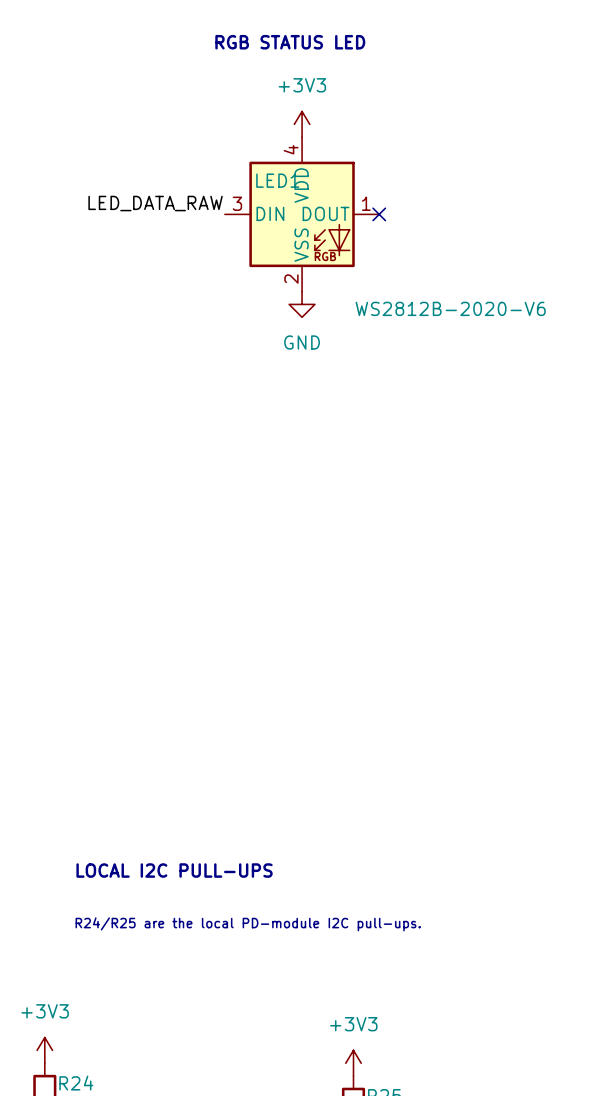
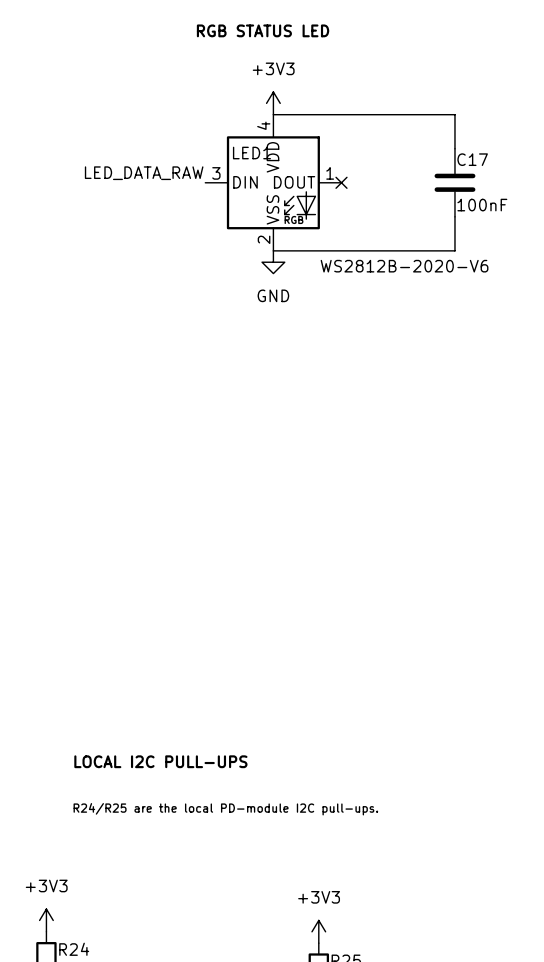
wire: none -> (273, 114) (454, 114) (454, 148)
C17: none -> 100nF (454, 182)
wire: none -> (454, 216) (454, 250) (273, 250)

